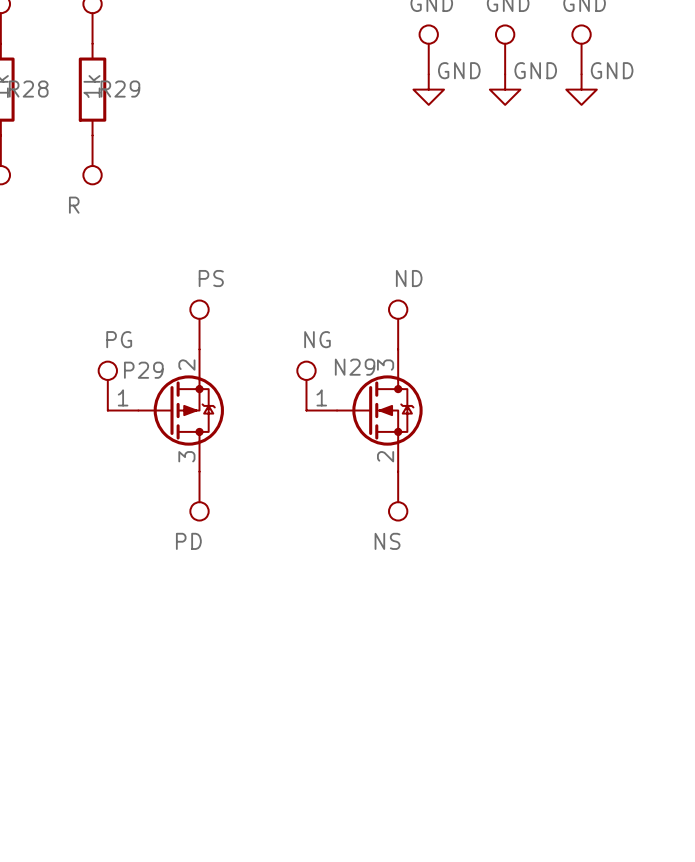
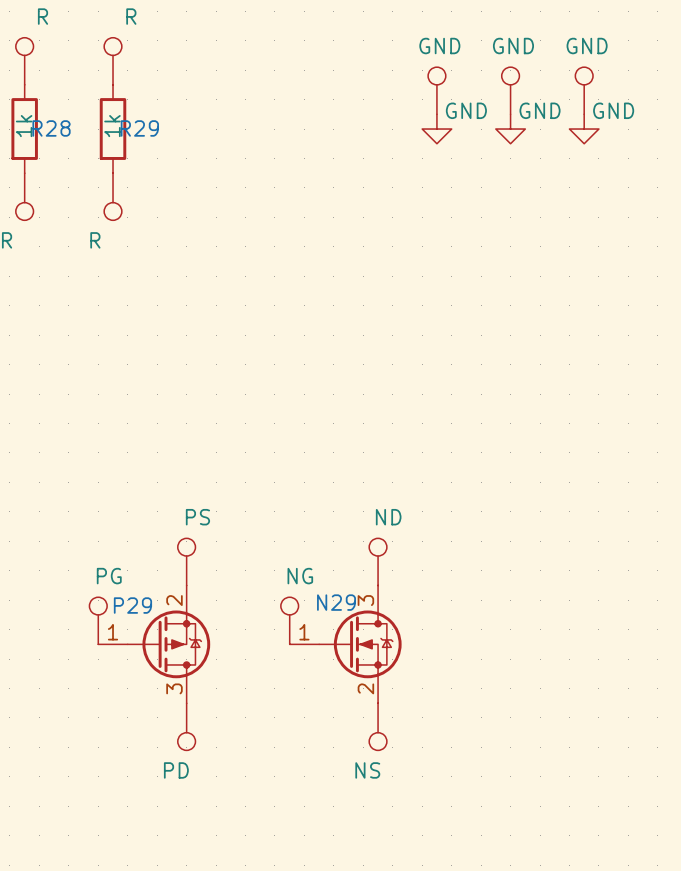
part position: (199, 324) -> (186, 561)
part position: (398, 324) -> (378, 561)
part position: (107, 386) -> (98, 620)
part position: (306, 386) -> (289, 620)
P29 position: (165, 410) -> (154, 644)
N29 position: (364, 410) -> (345, 644)
part position: (199, 496) -> (186, 726)
part position: (398, 496) -> (378, 726)

